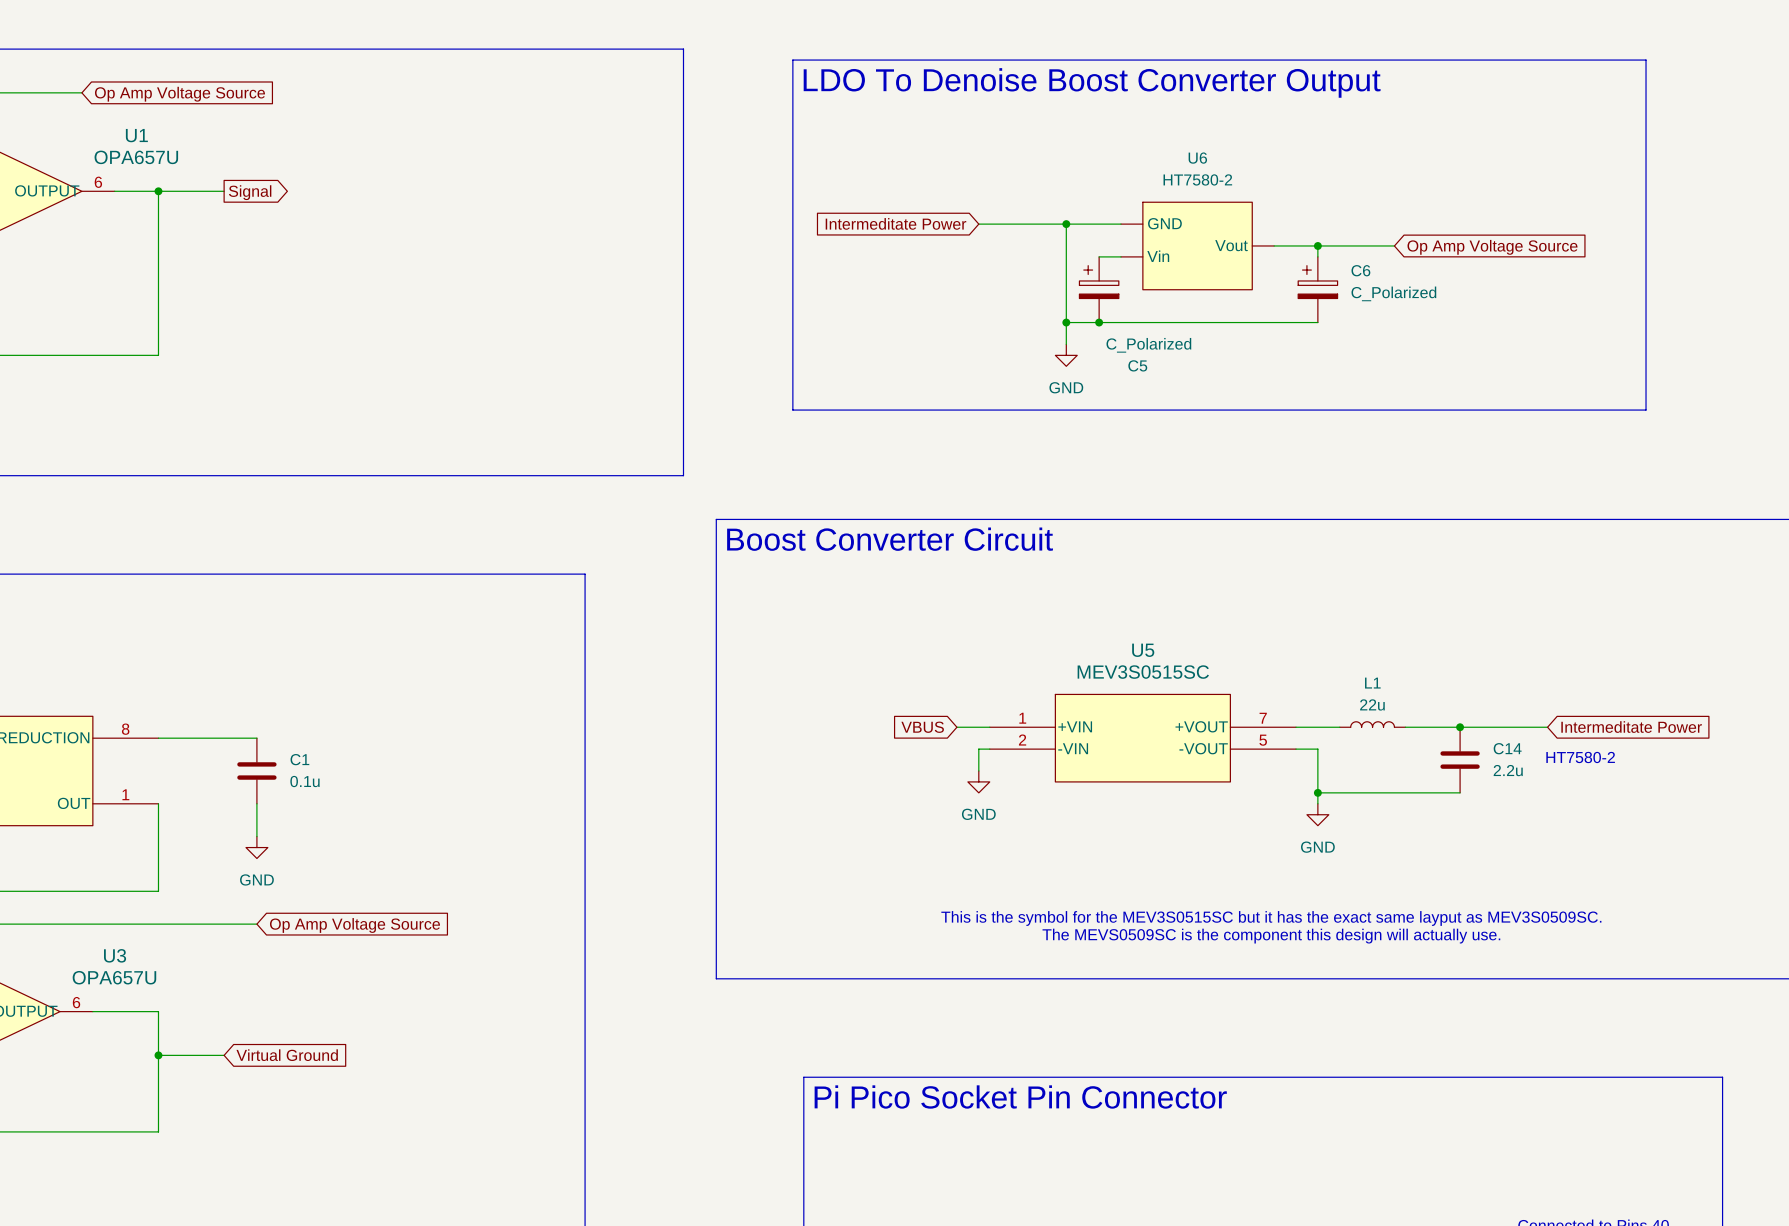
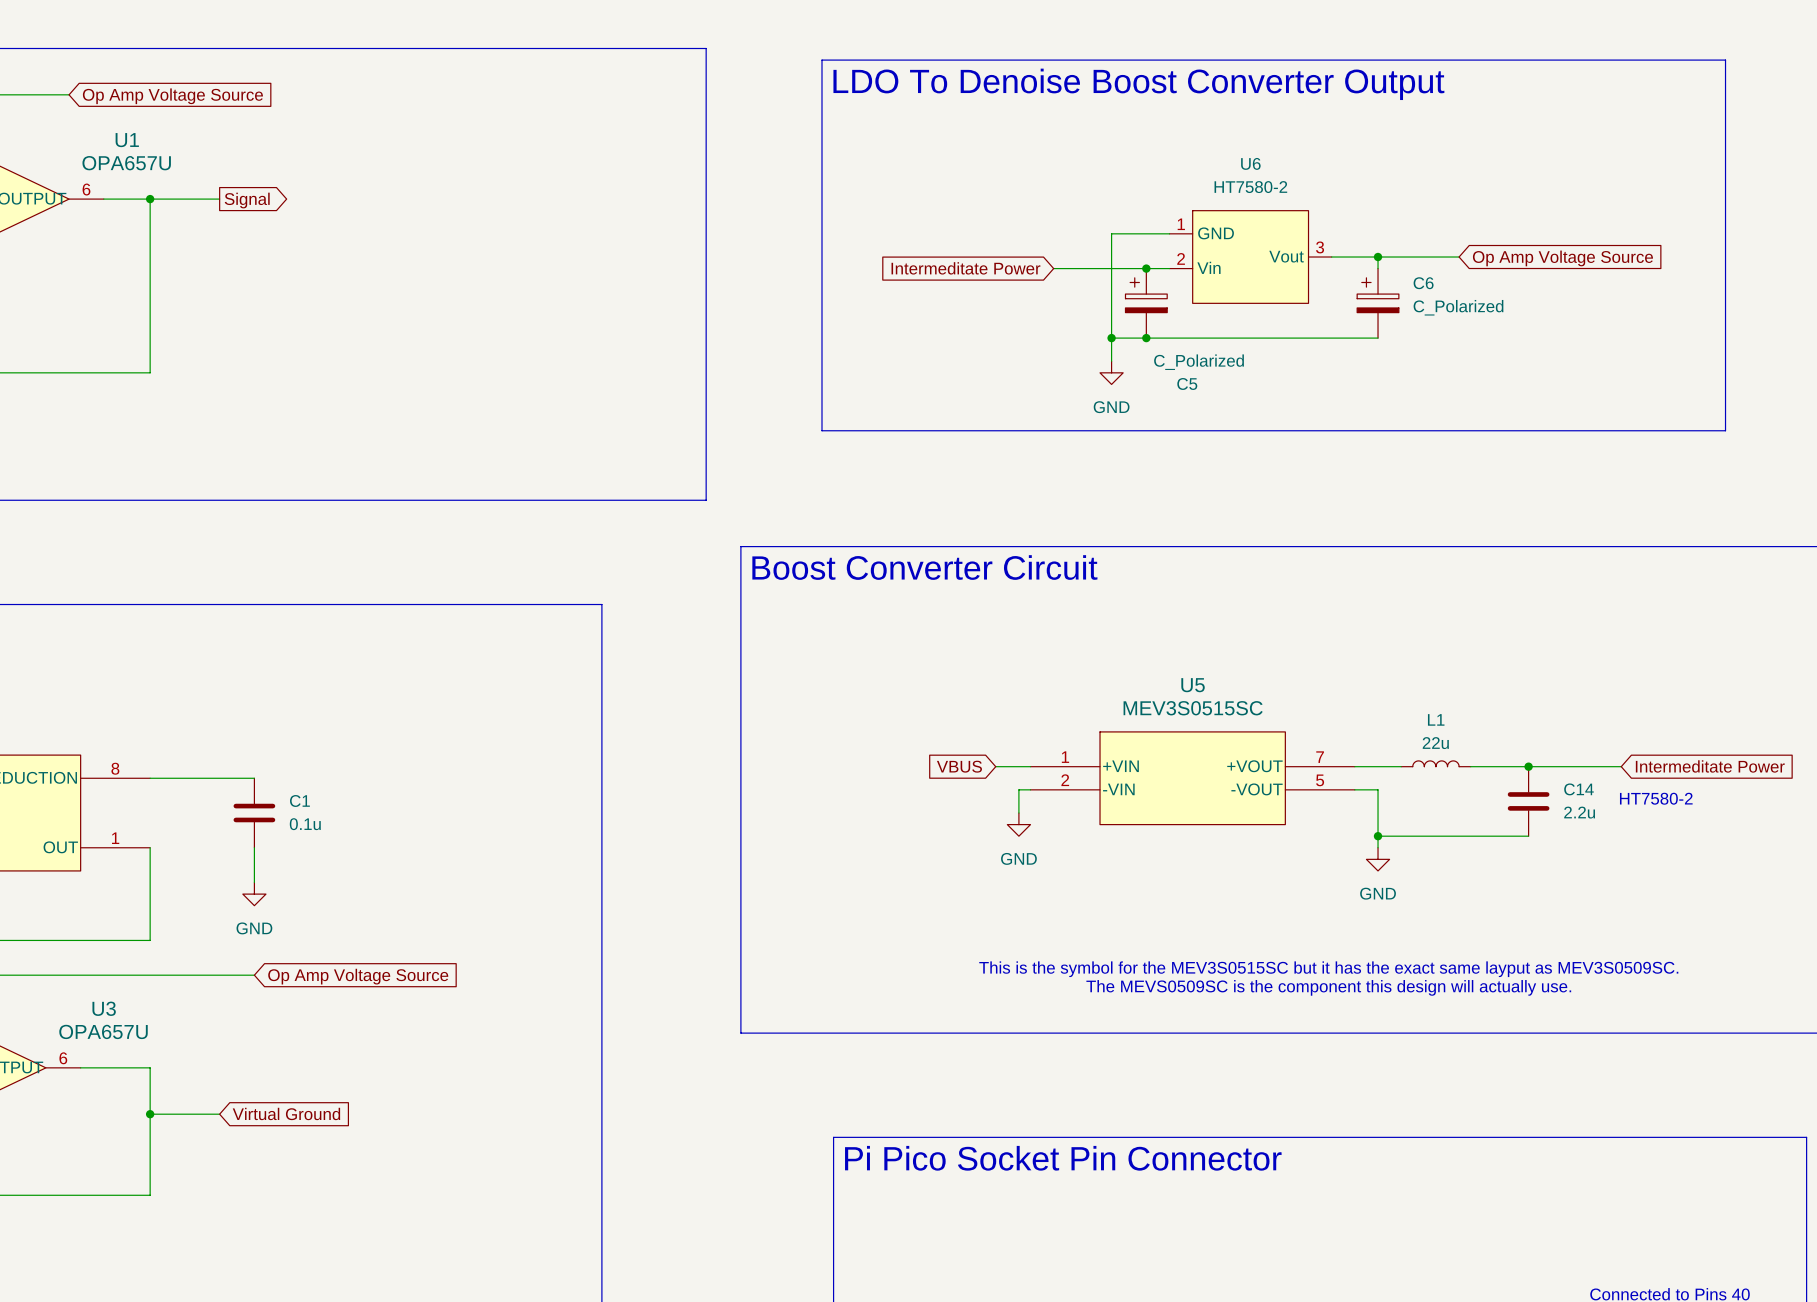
U6 pin number: none -> 1 (1181, 224)
global label position: Intermeditate Power (895, 223) -> Intermeditate Power (965, 268)
wire: (978, 224) (1066, 224) -> (1053, 268) (1146, 268)
junction position: (1066, 224) -> (1146, 268)
U6 pin number: none -> 3 (1320, 247)
U6 pin number: none -> 2 (1181, 258)

